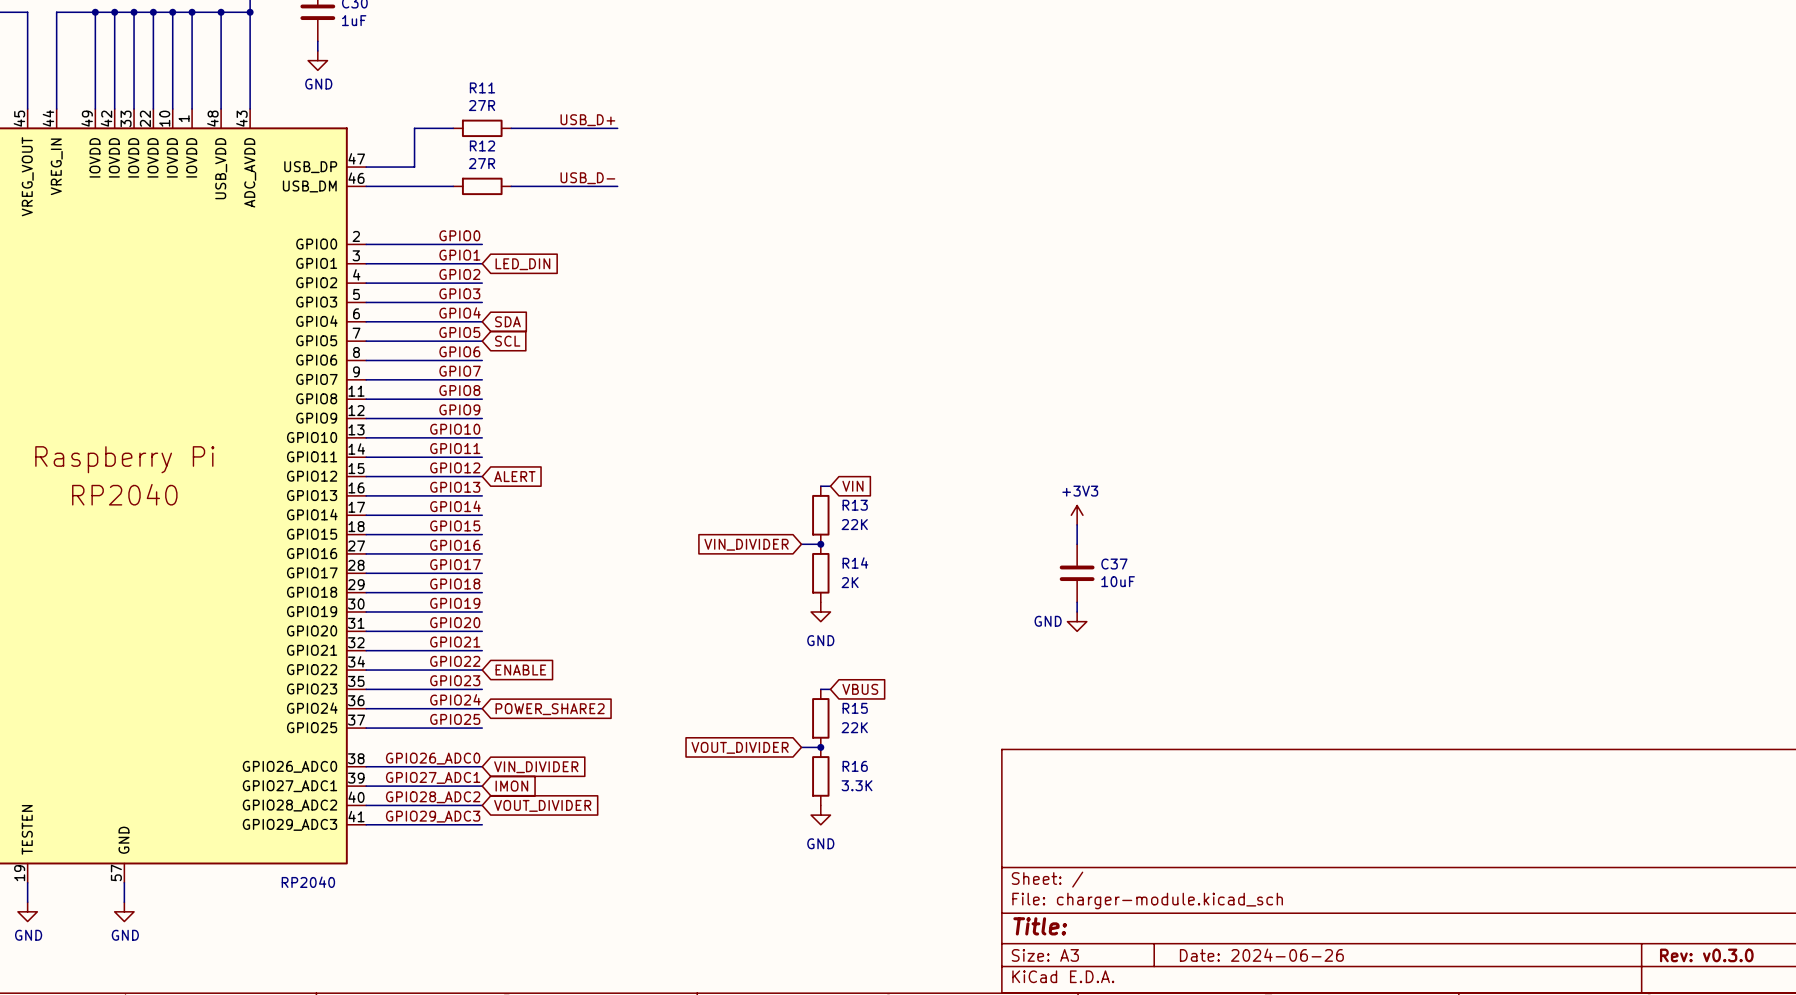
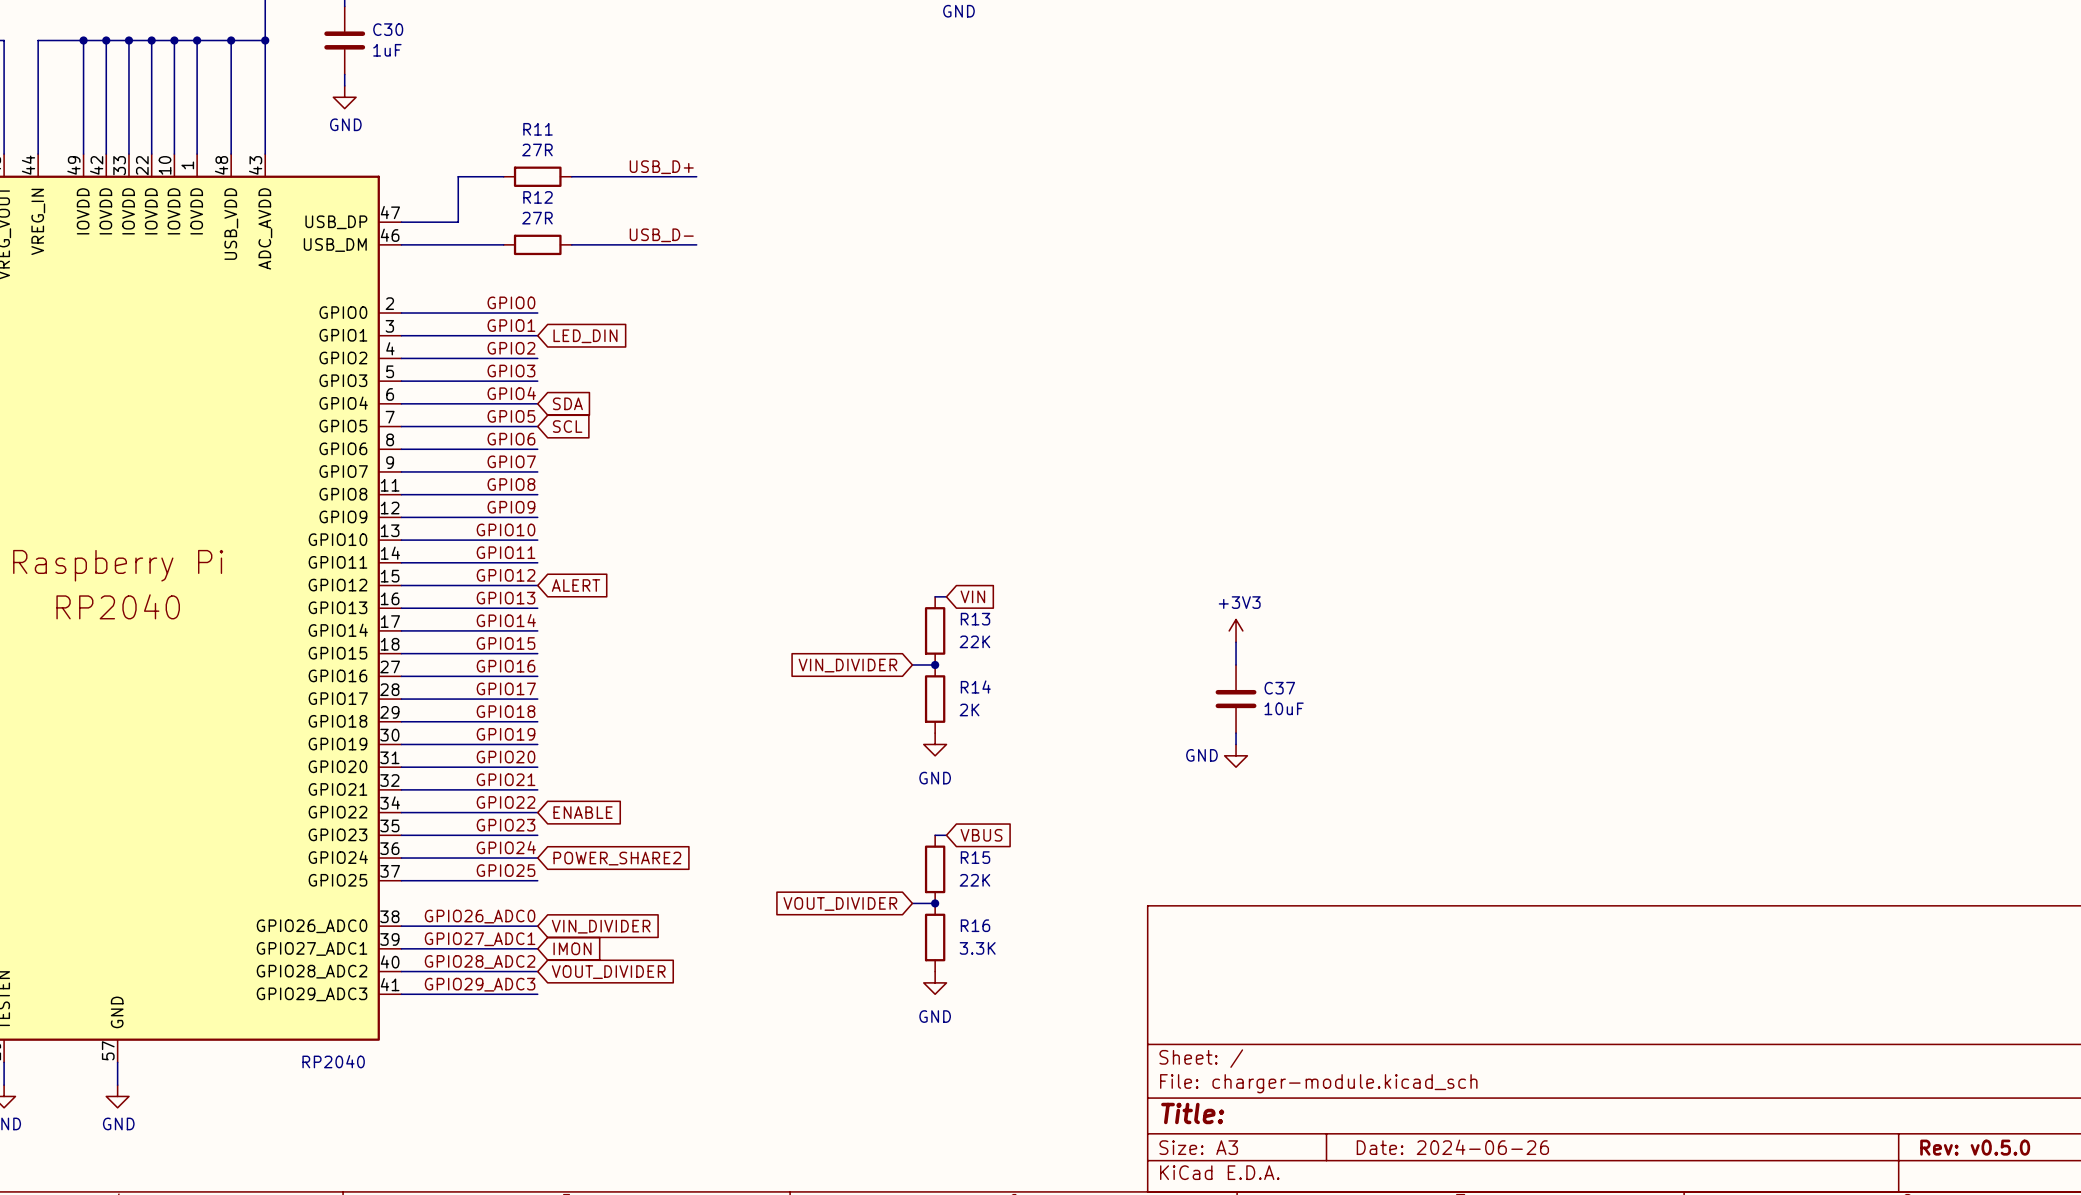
title block: Rev: v0.3.0 (1706, 955) -> Rev: v0.5.0 (1975, 1147)

